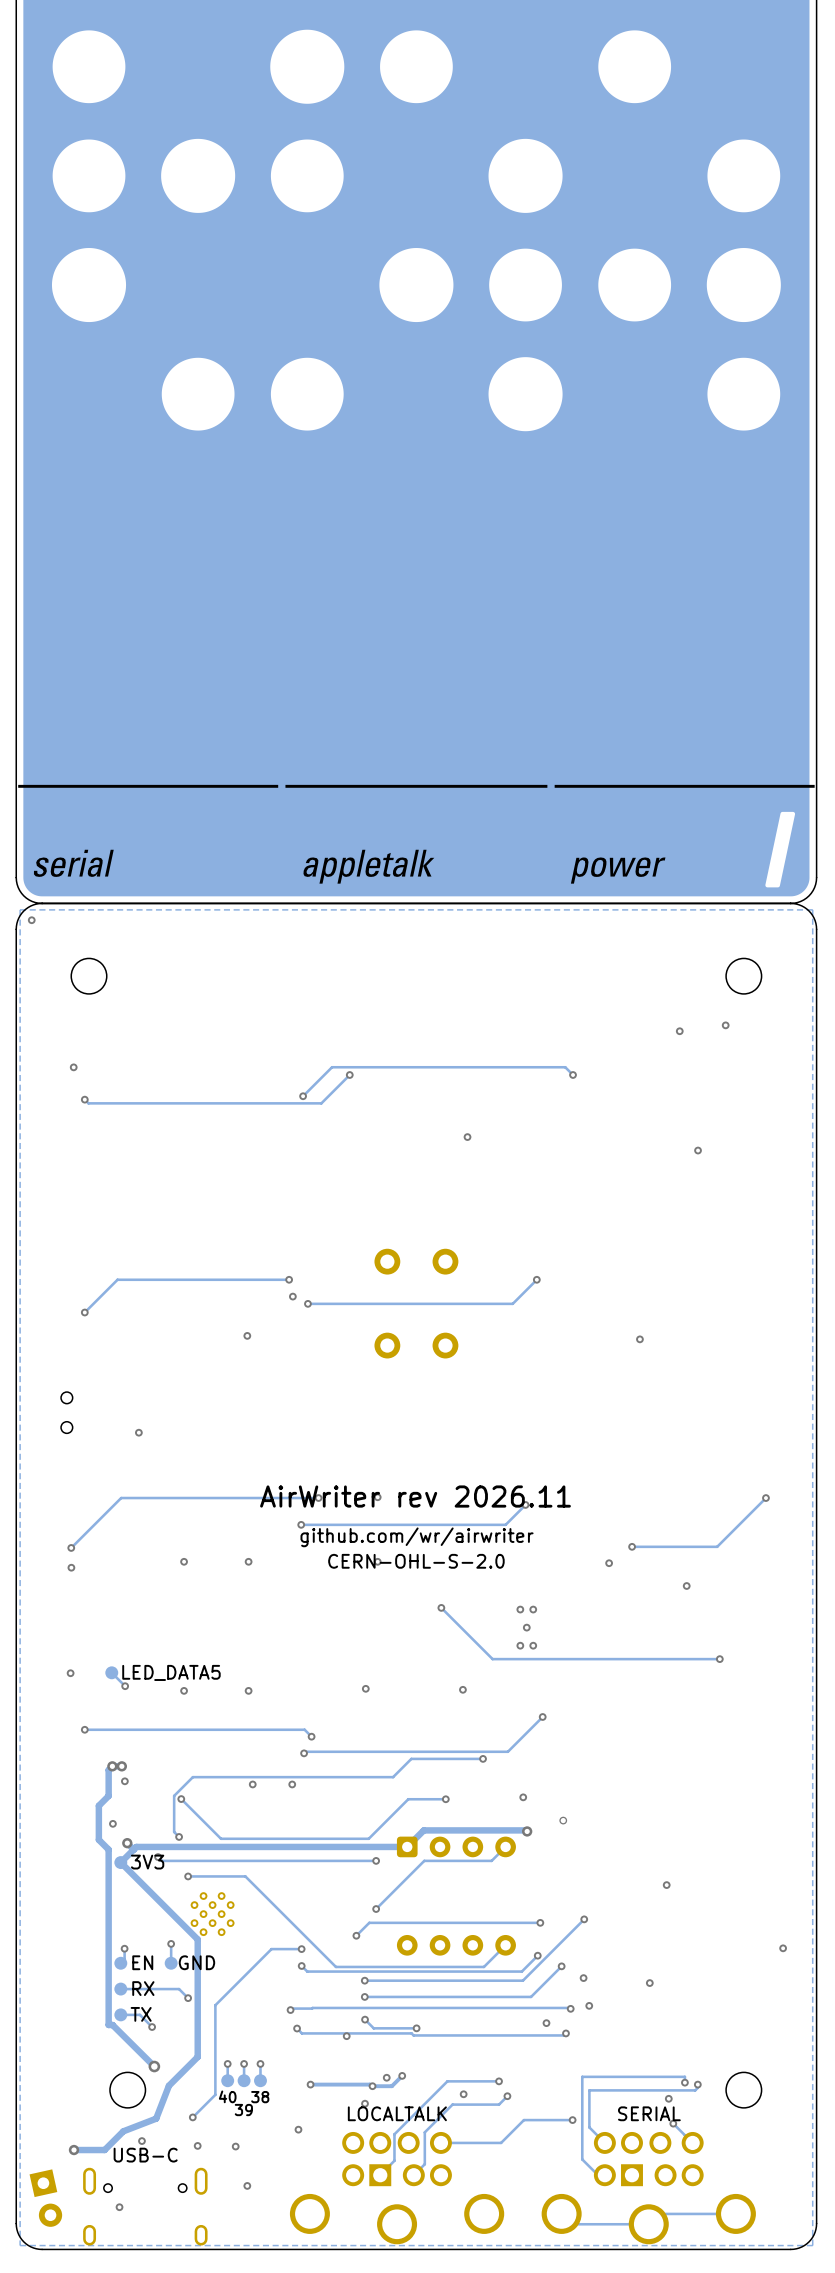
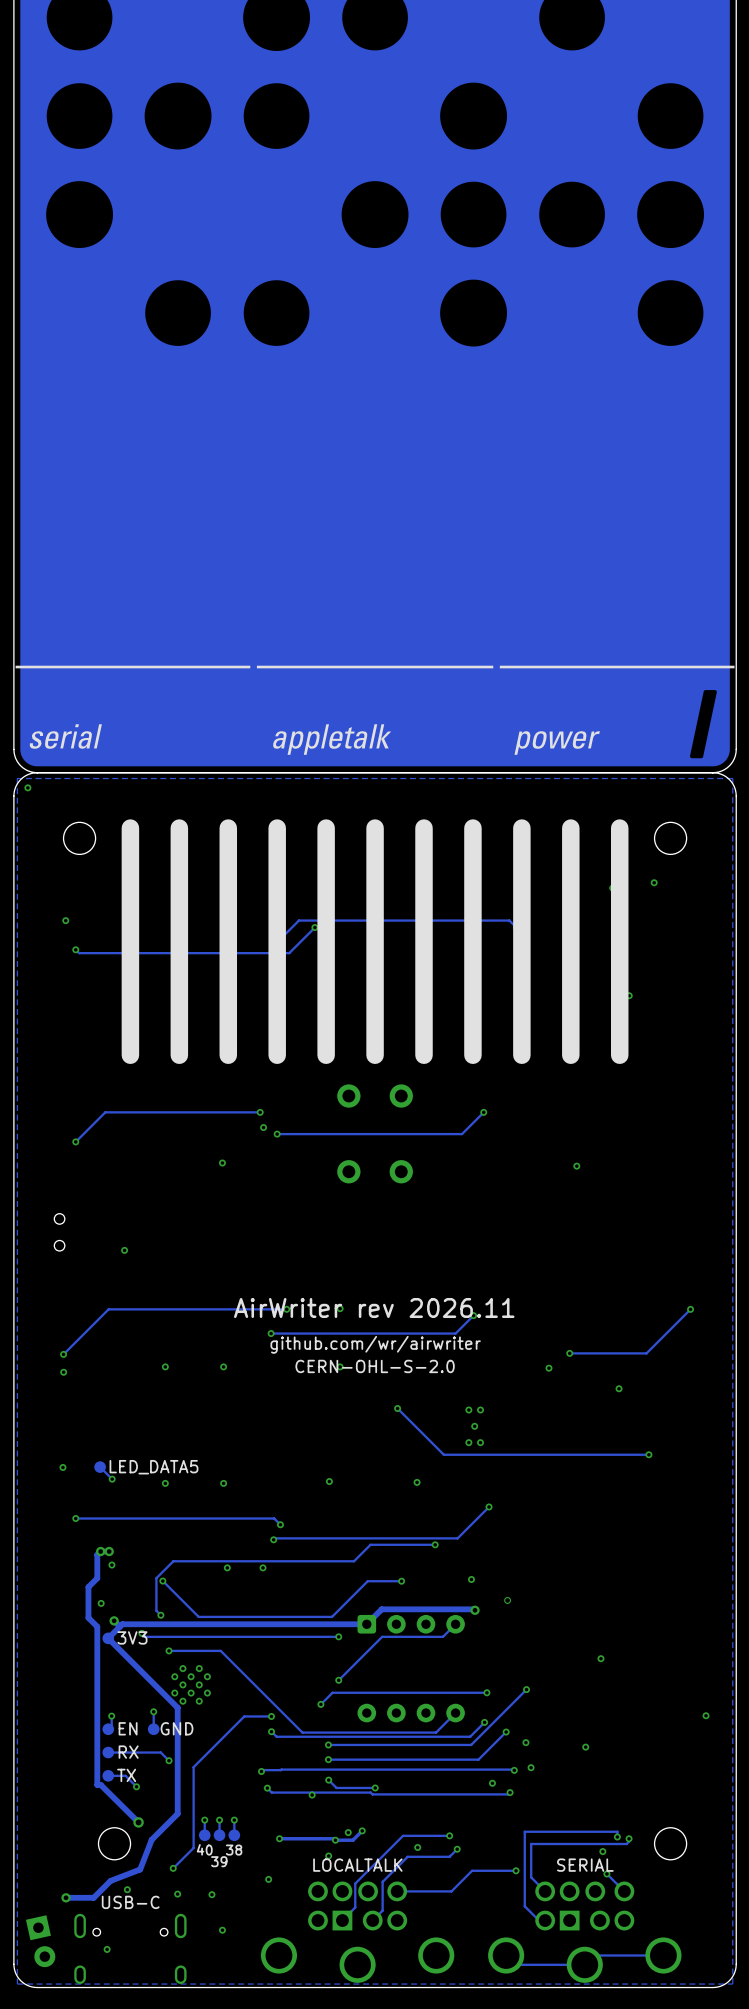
line: none -> (130, 828) (130, 1055)
line: none -> (179, 828) (179, 1055)
line: none -> (228, 828) (228, 1055)
line: none -> (277, 828) (277, 1055)
line: none -> (326, 828) (326, 1055)
line: none -> (375, 828) (375, 1055)
line: none -> (424, 828) (424, 1055)
line: none -> (472, 828) (472, 1055)
line: none -> (521, 828) (521, 1055)
line: none -> (570, 828) (570, 1055)
line: none -> (619, 828) (619, 1055)

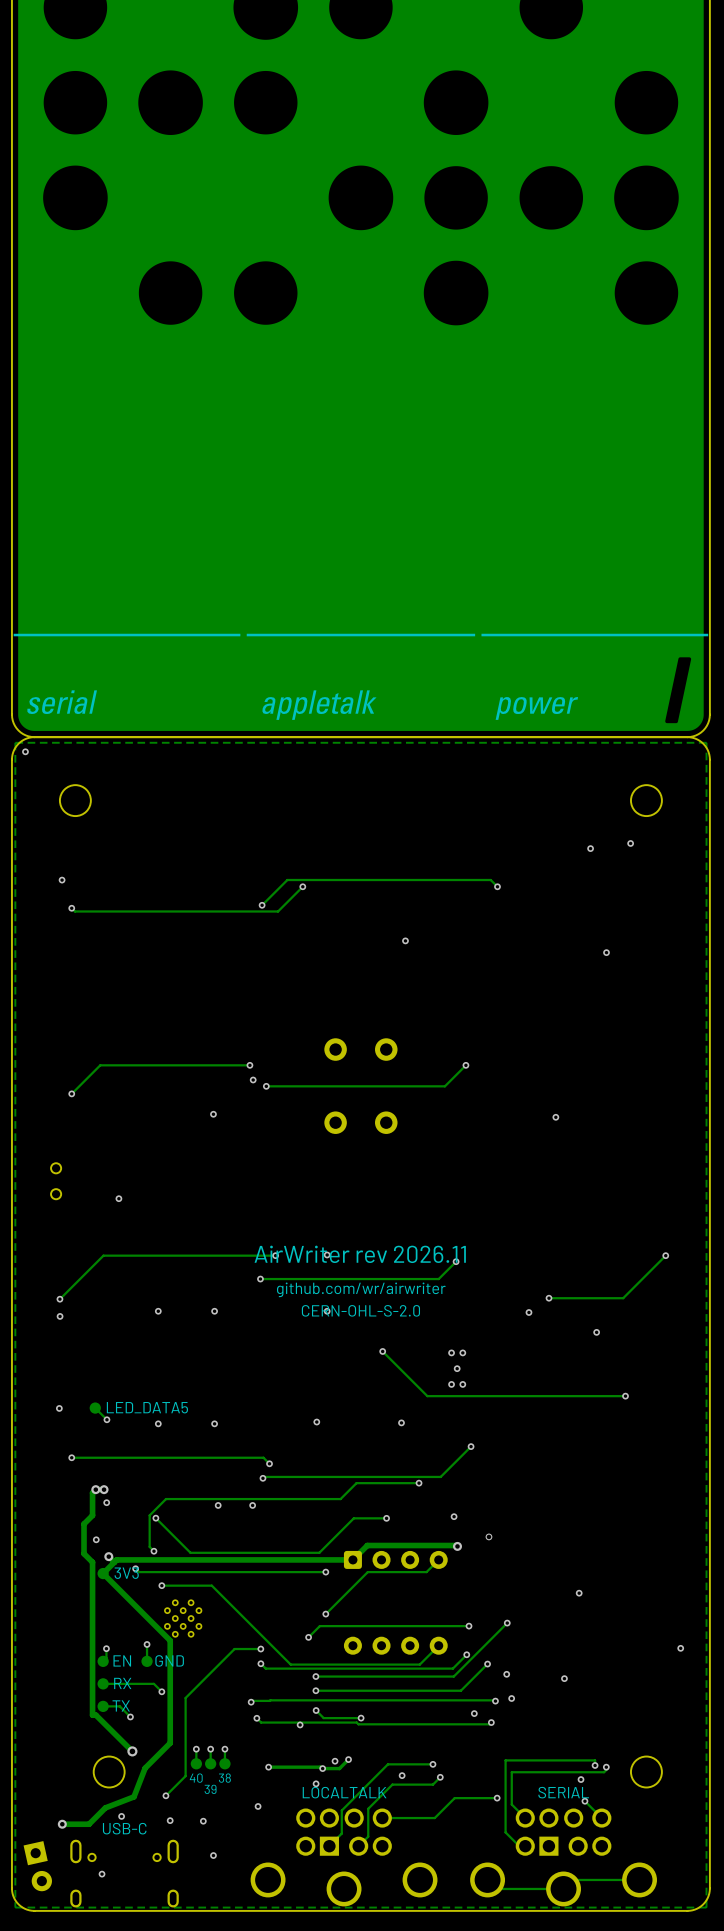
line: (130, 828) (130, 1055) -> none
line: (179, 828) (179, 1055) -> none
line: (228, 828) (228, 1055) -> none
line: (277, 828) (277, 1055) -> none
line: (326, 828) (326, 1055) -> none
line: (375, 828) (375, 1055) -> none
line: (424, 828) (424, 1055) -> none
line: (472, 828) (472, 1055) -> none
line: (521, 828) (521, 1055) -> none
line: (570, 828) (570, 1055) -> none
line: (619, 828) (619, 1055) -> none

